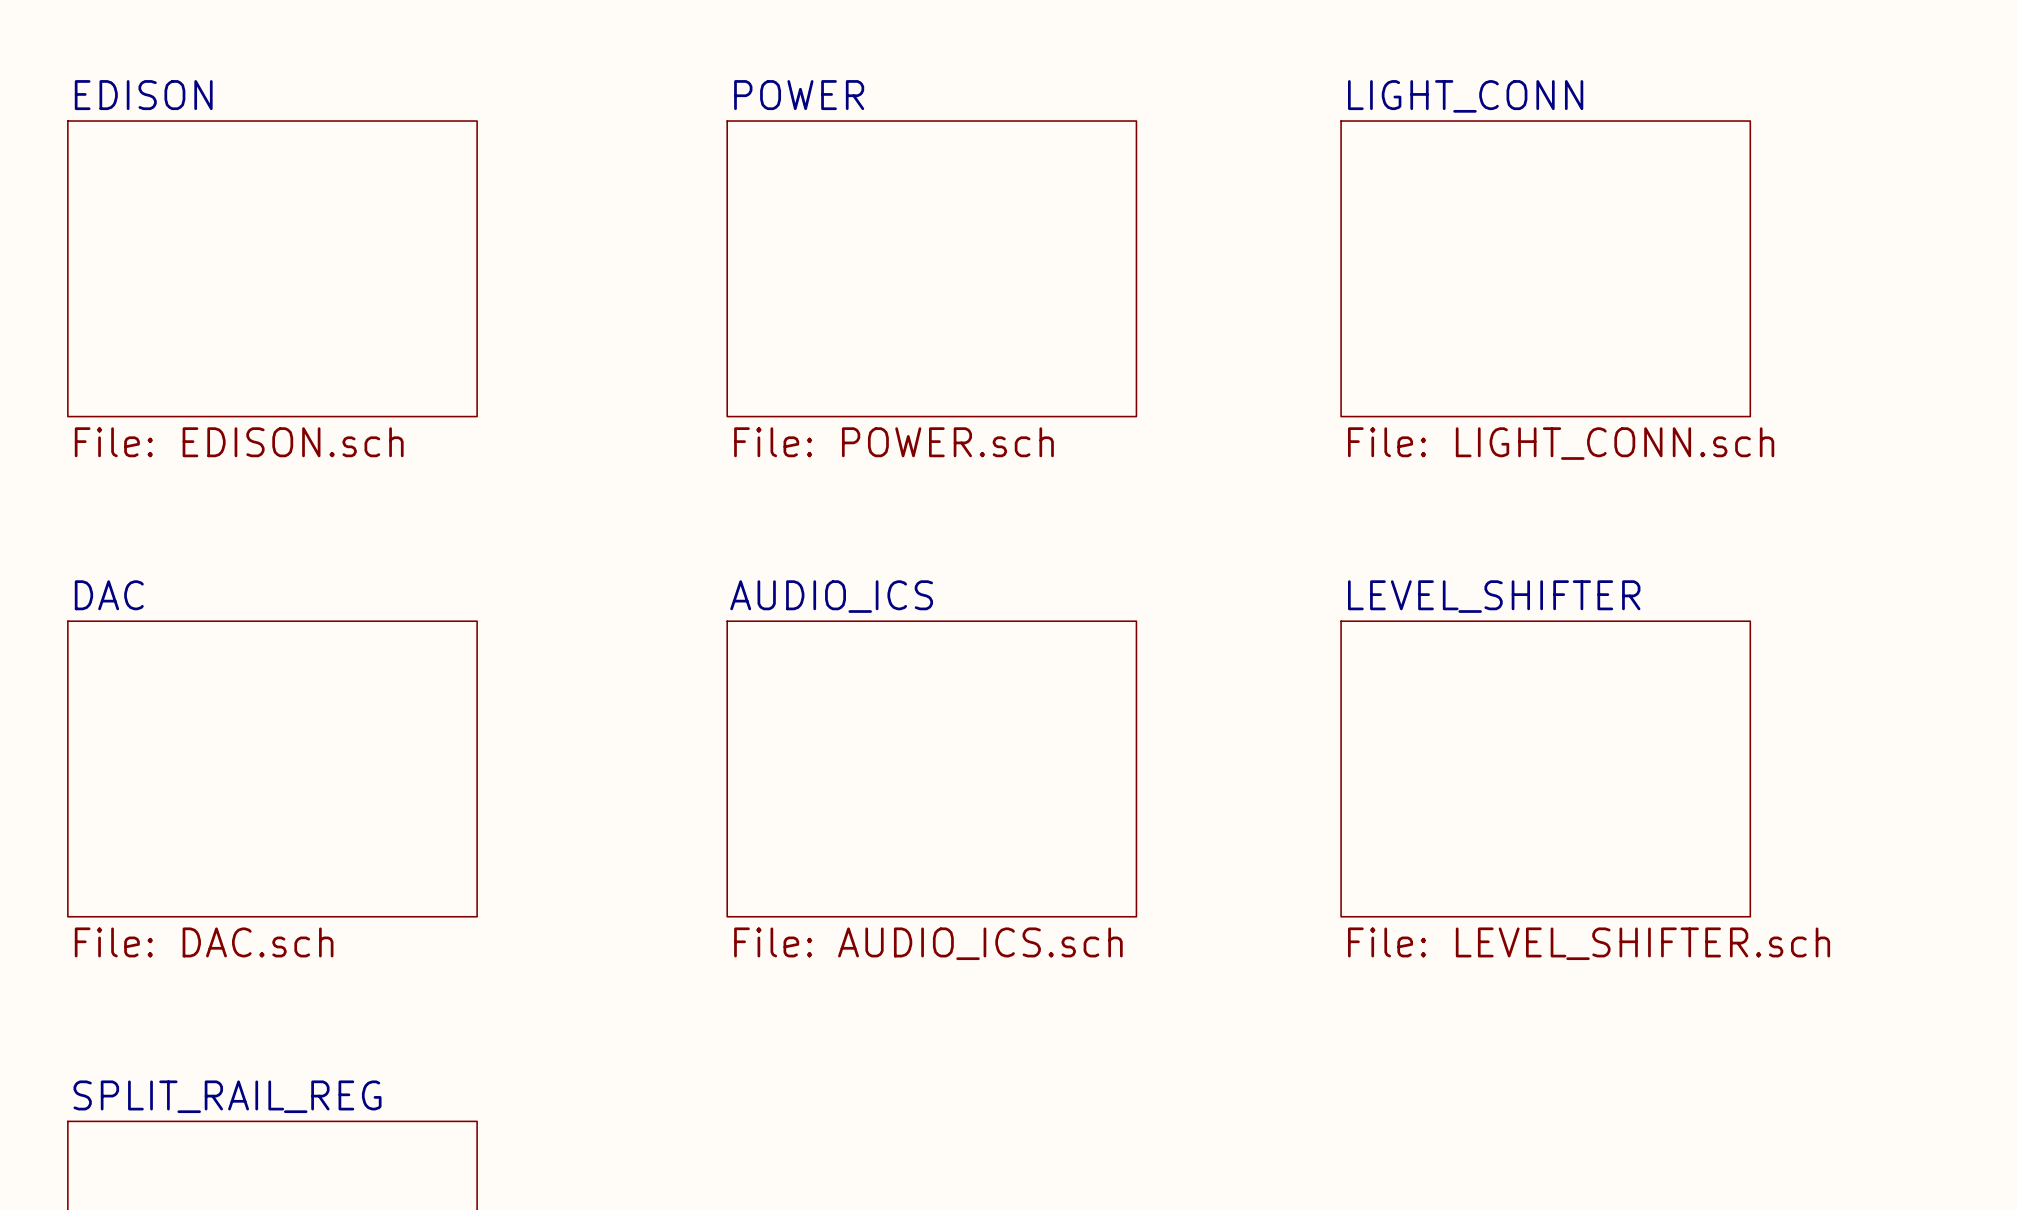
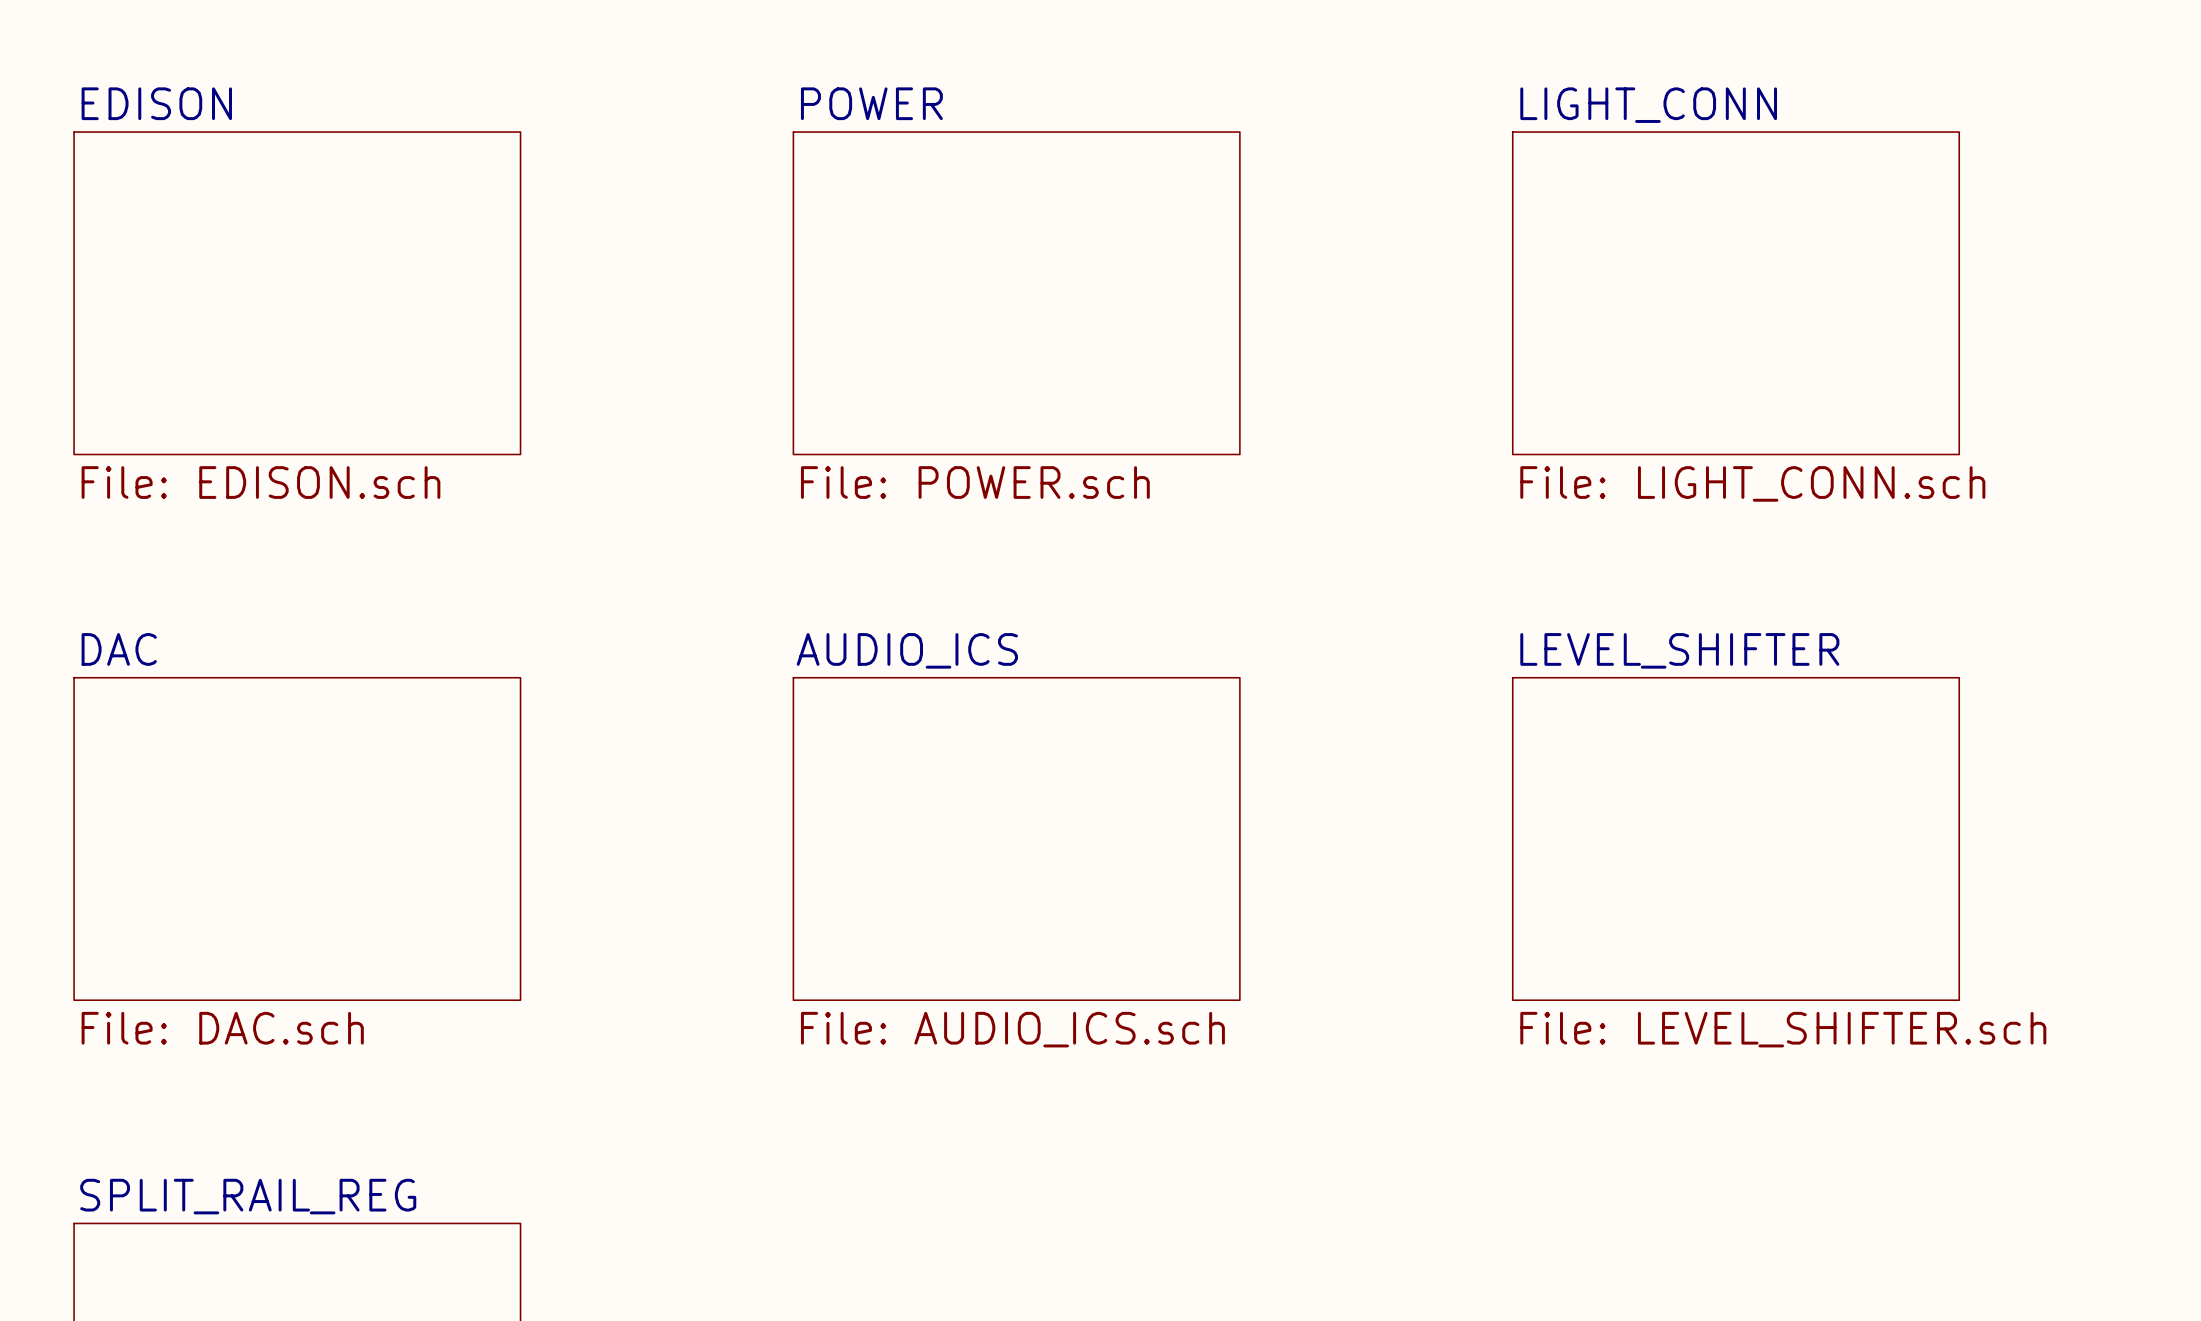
sheet LIGHT_CONN position: (1545, 268) -> (1735, 293)
sheet LEVEL_SHIFTER position: (1545, 768) -> (1735, 838)

